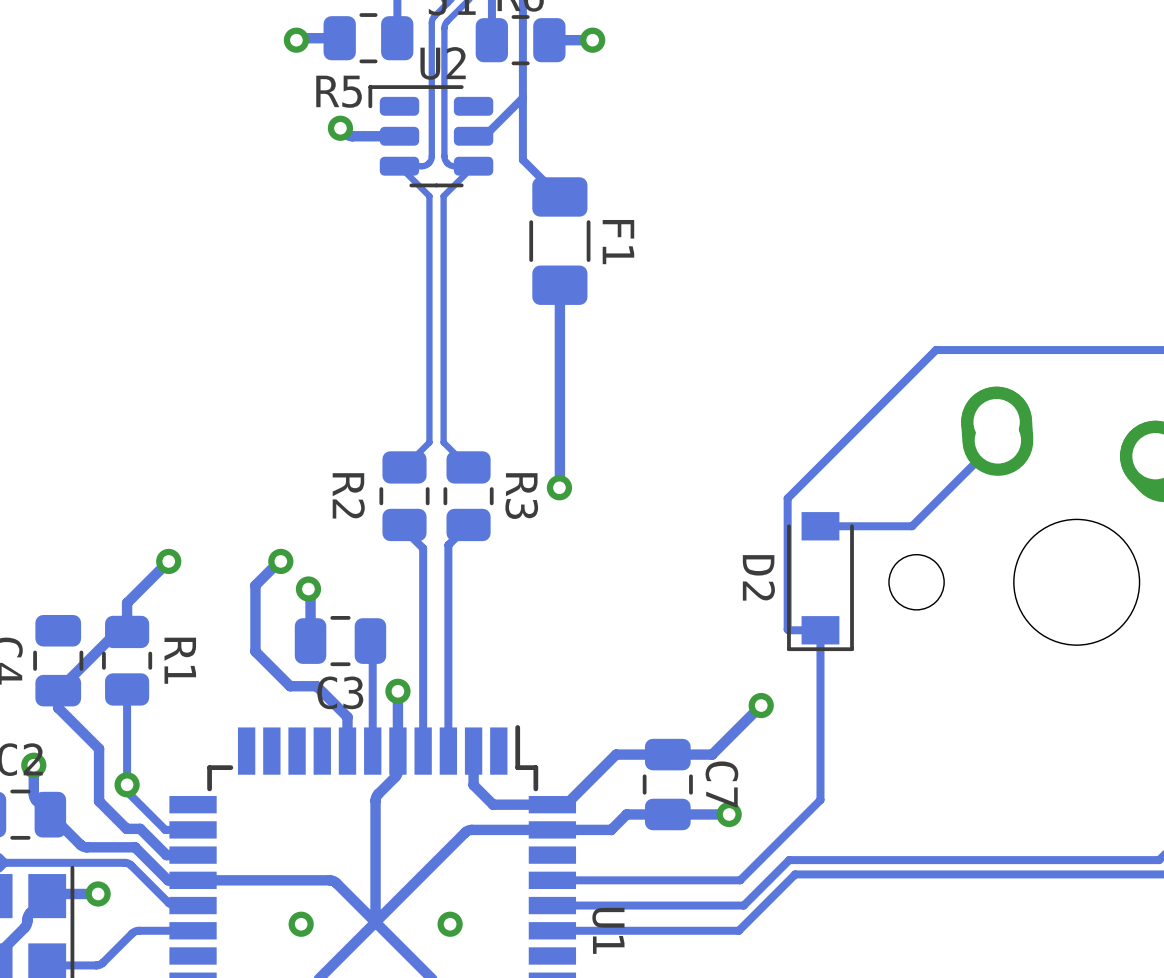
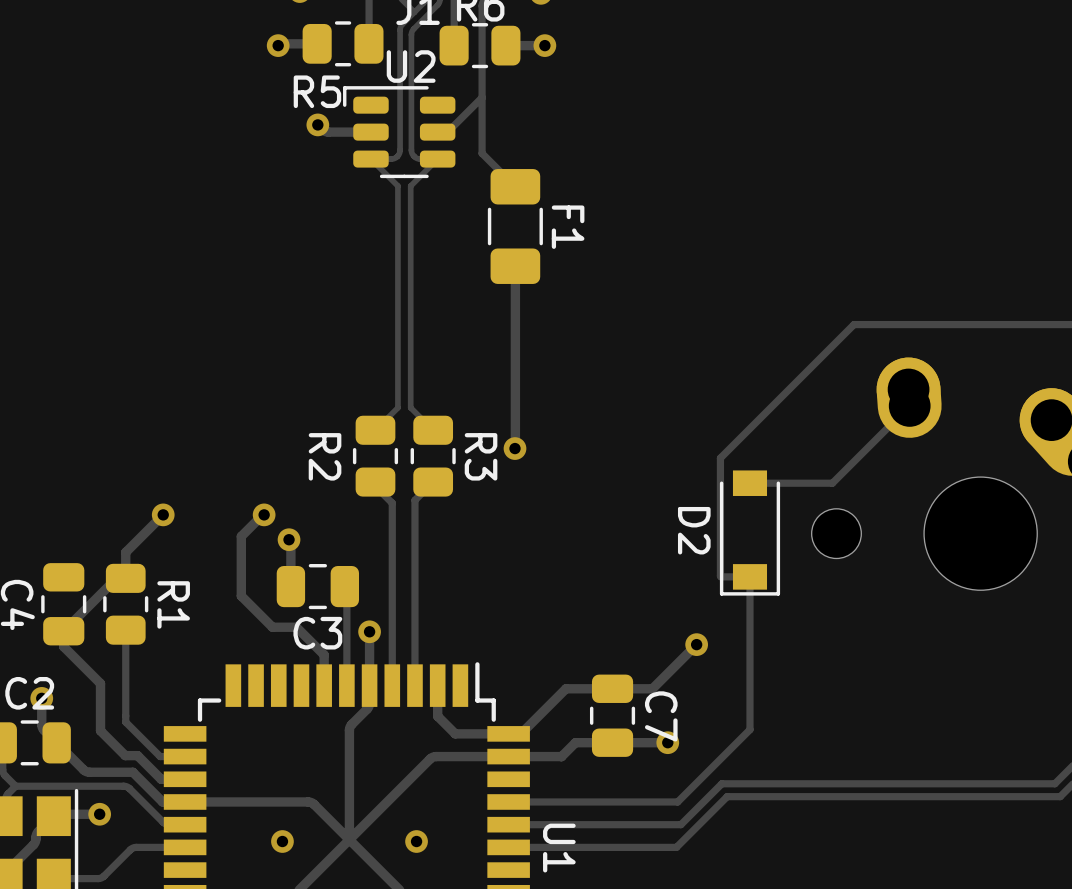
via: (127, 784) -> none

